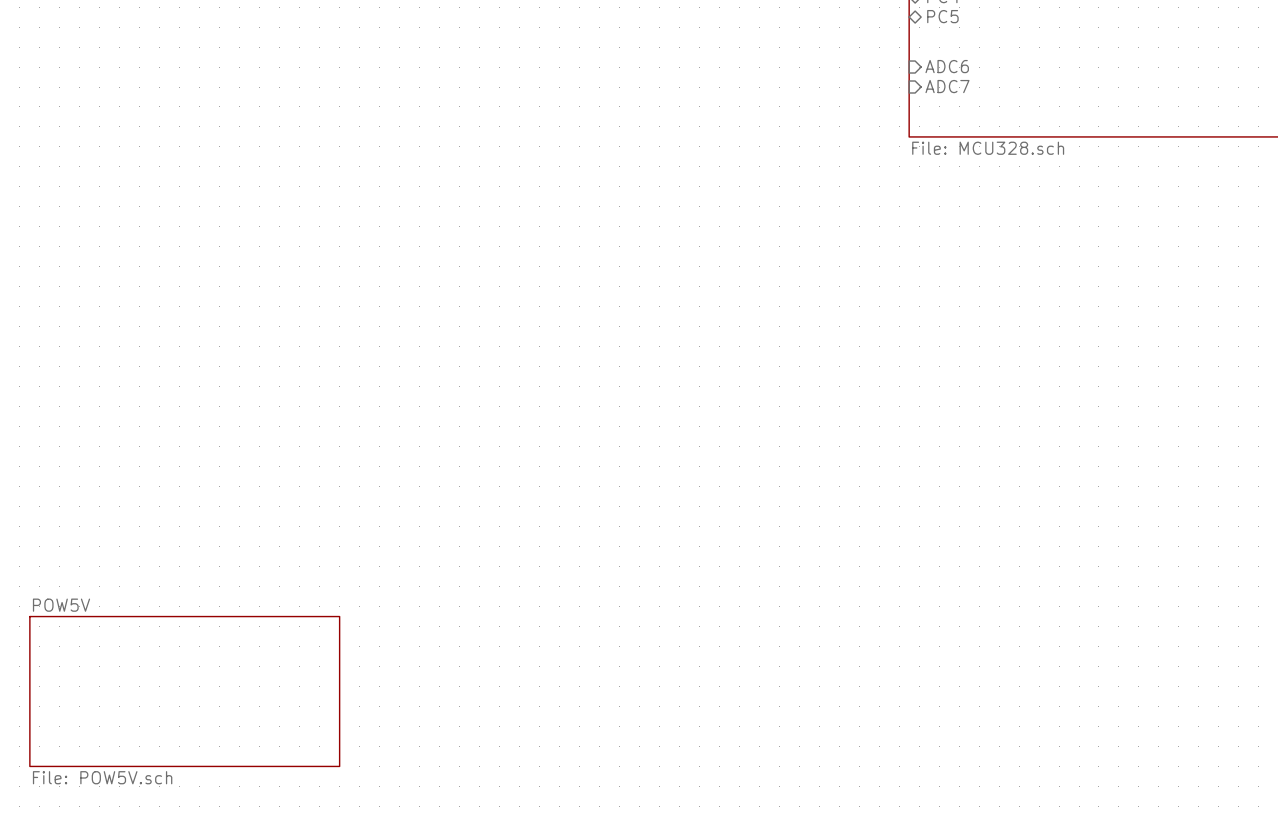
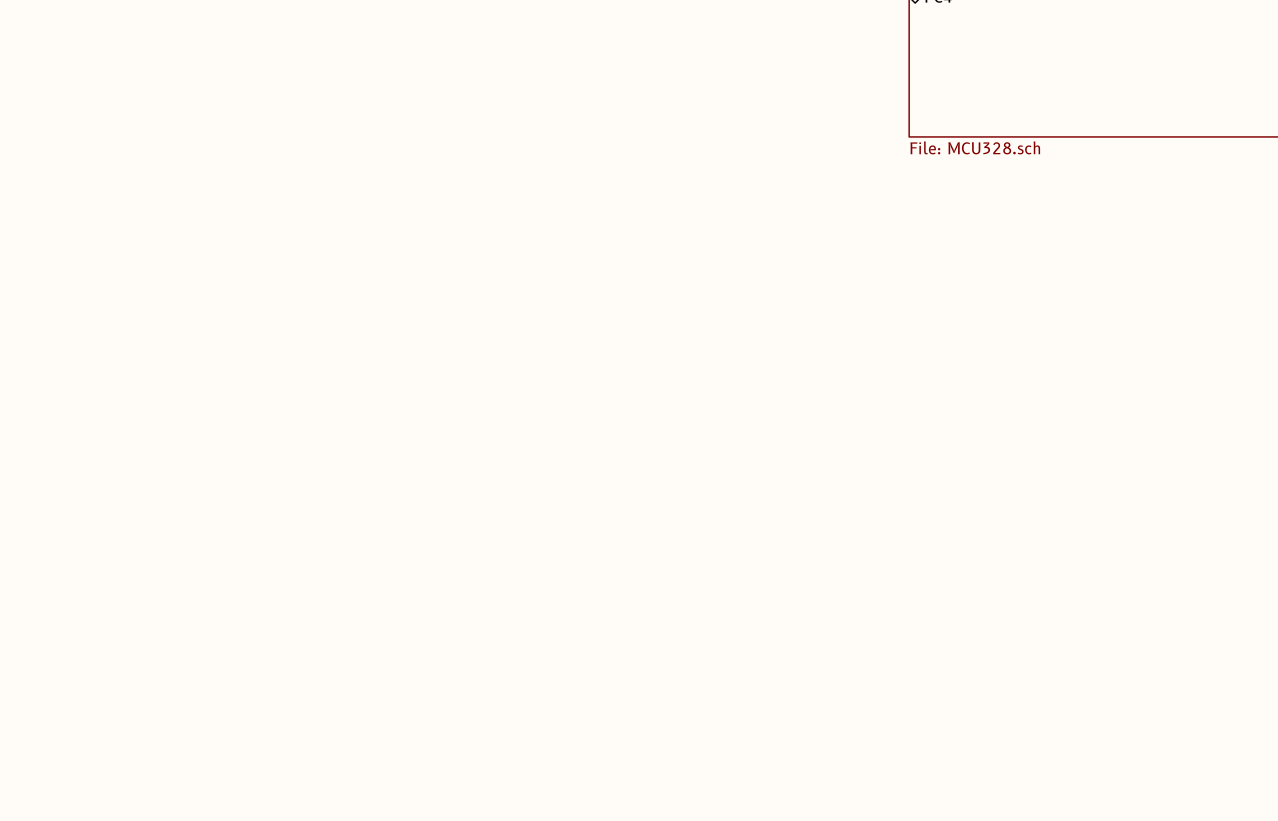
sheet pin: PC5 (942, 16) -> none
sheet pin: ADC6 (947, 66) -> none
sheet pin: ADC7 (947, 86) -> none
sheet POW5V: File: POW5V.sch (184, 691) -> none

